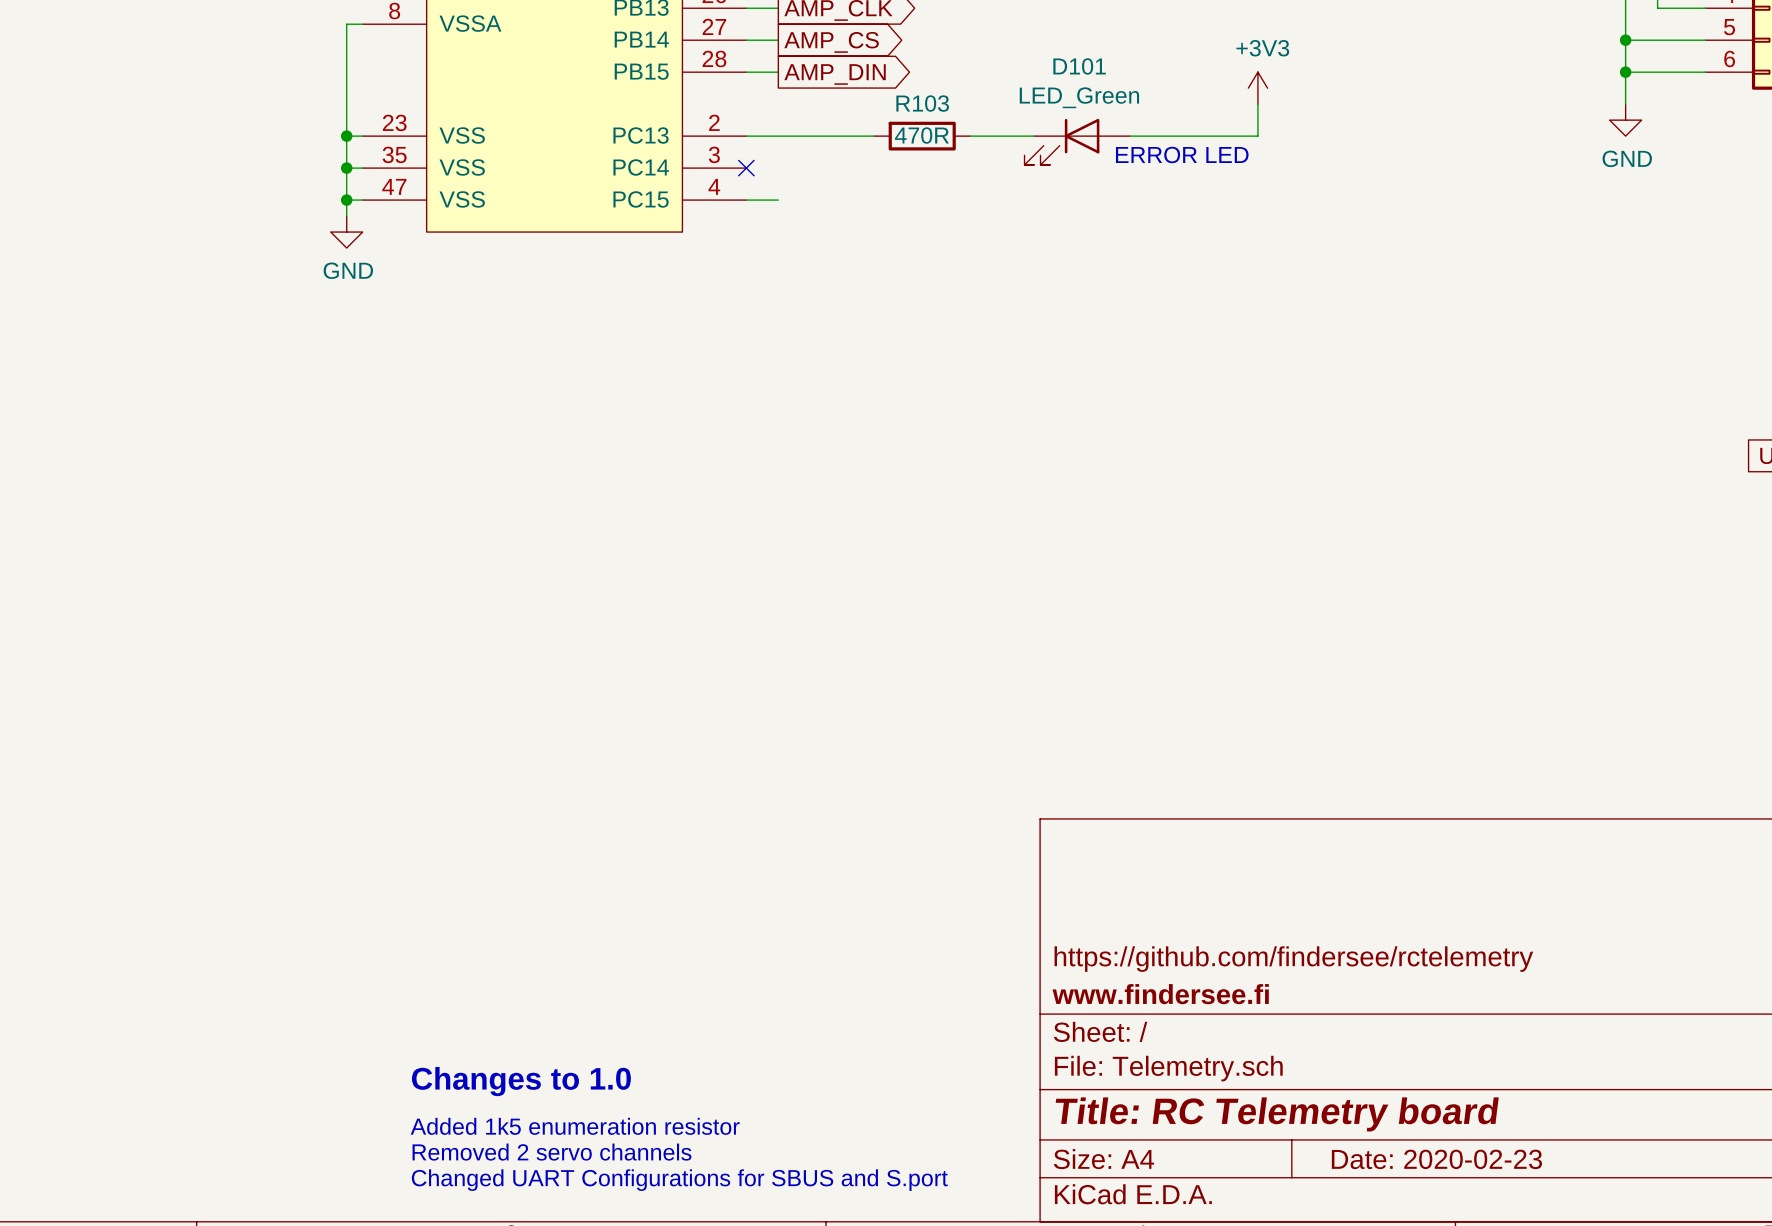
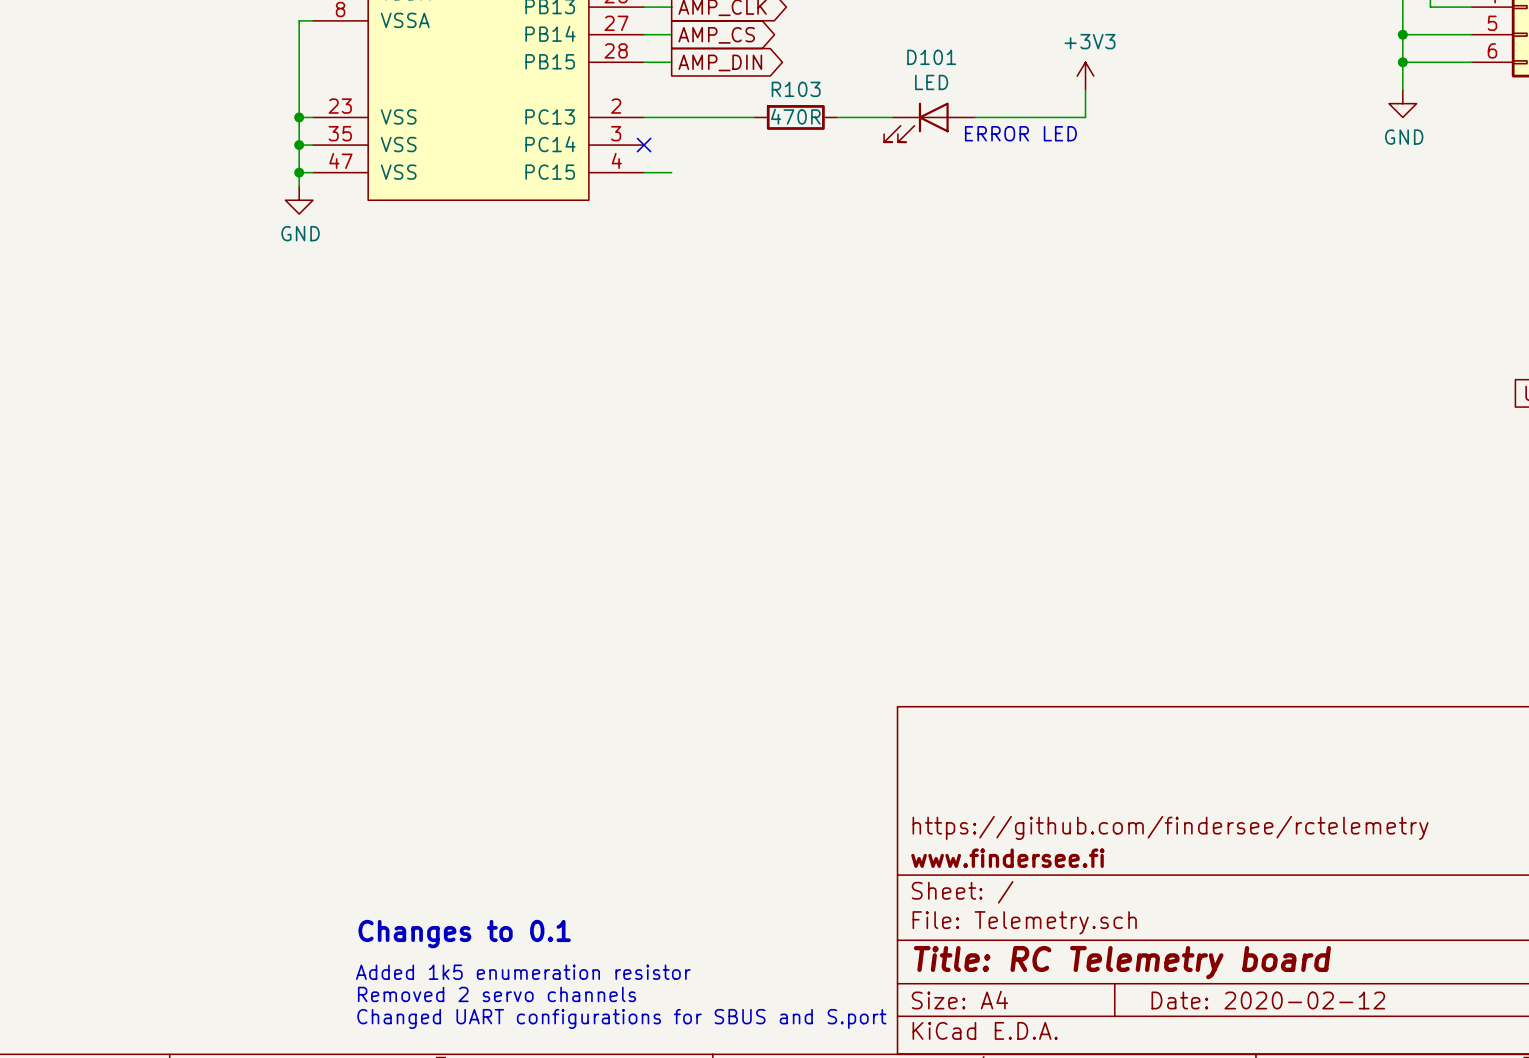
D101 value: LED_Green (1079, 97) -> LED (931, 82)
text: Changes to 1.0 (521, 1081) -> Changes to 0.1 (464, 934)
title block: Date: 2020-02-23 (1436, 1159) -> Date: 2020-02-12 (1268, 1000)
text: Changed UART Configurations for SBUS and S.port (679, 1180) -> Changed UART configurations for SBUS and S.port (621, 1018)

